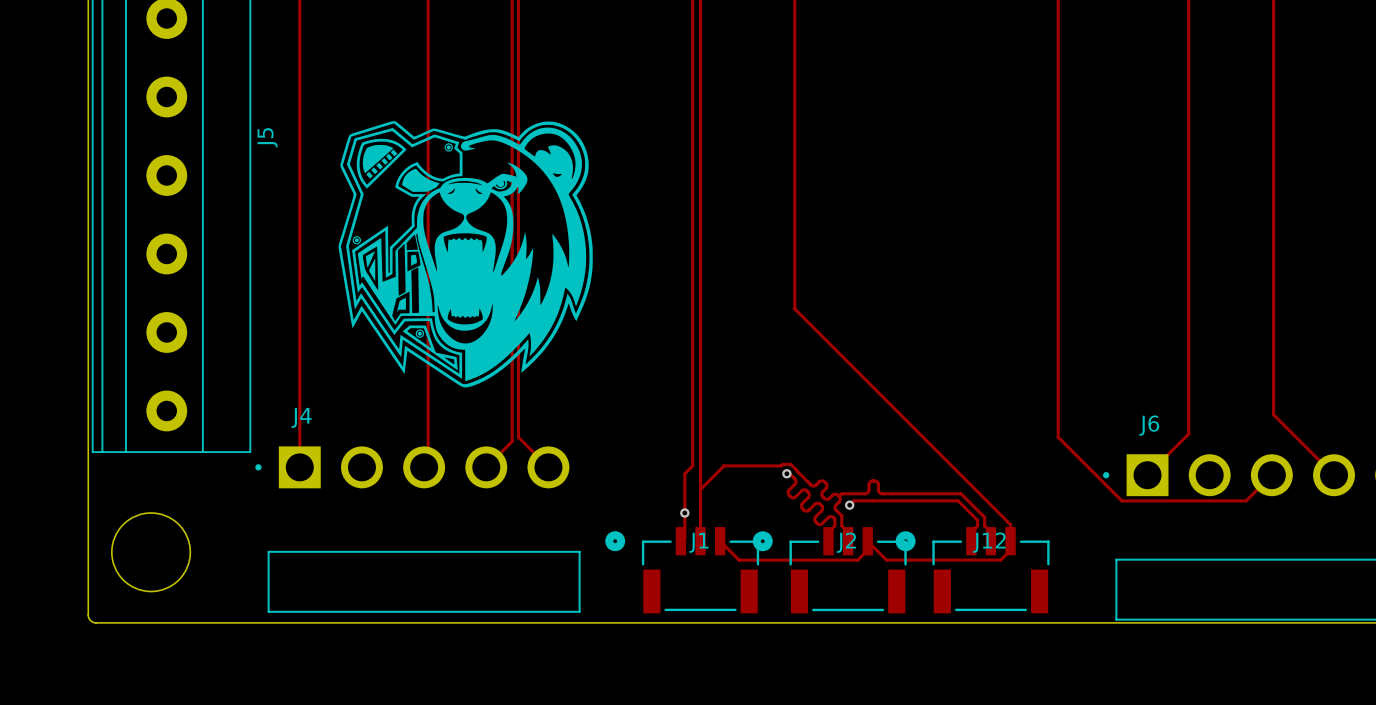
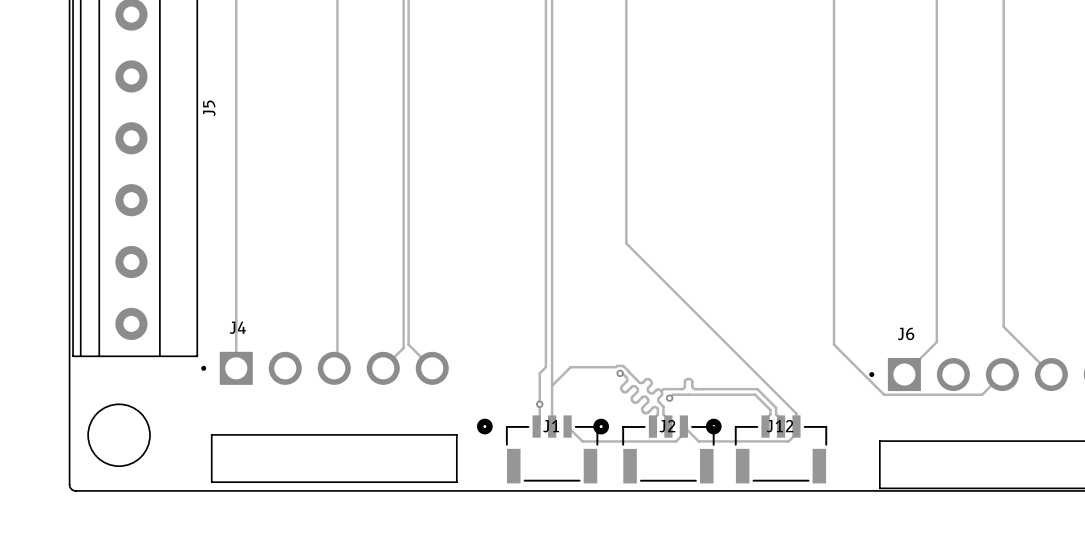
drawing: [338, 121, 593, 388] -> none

